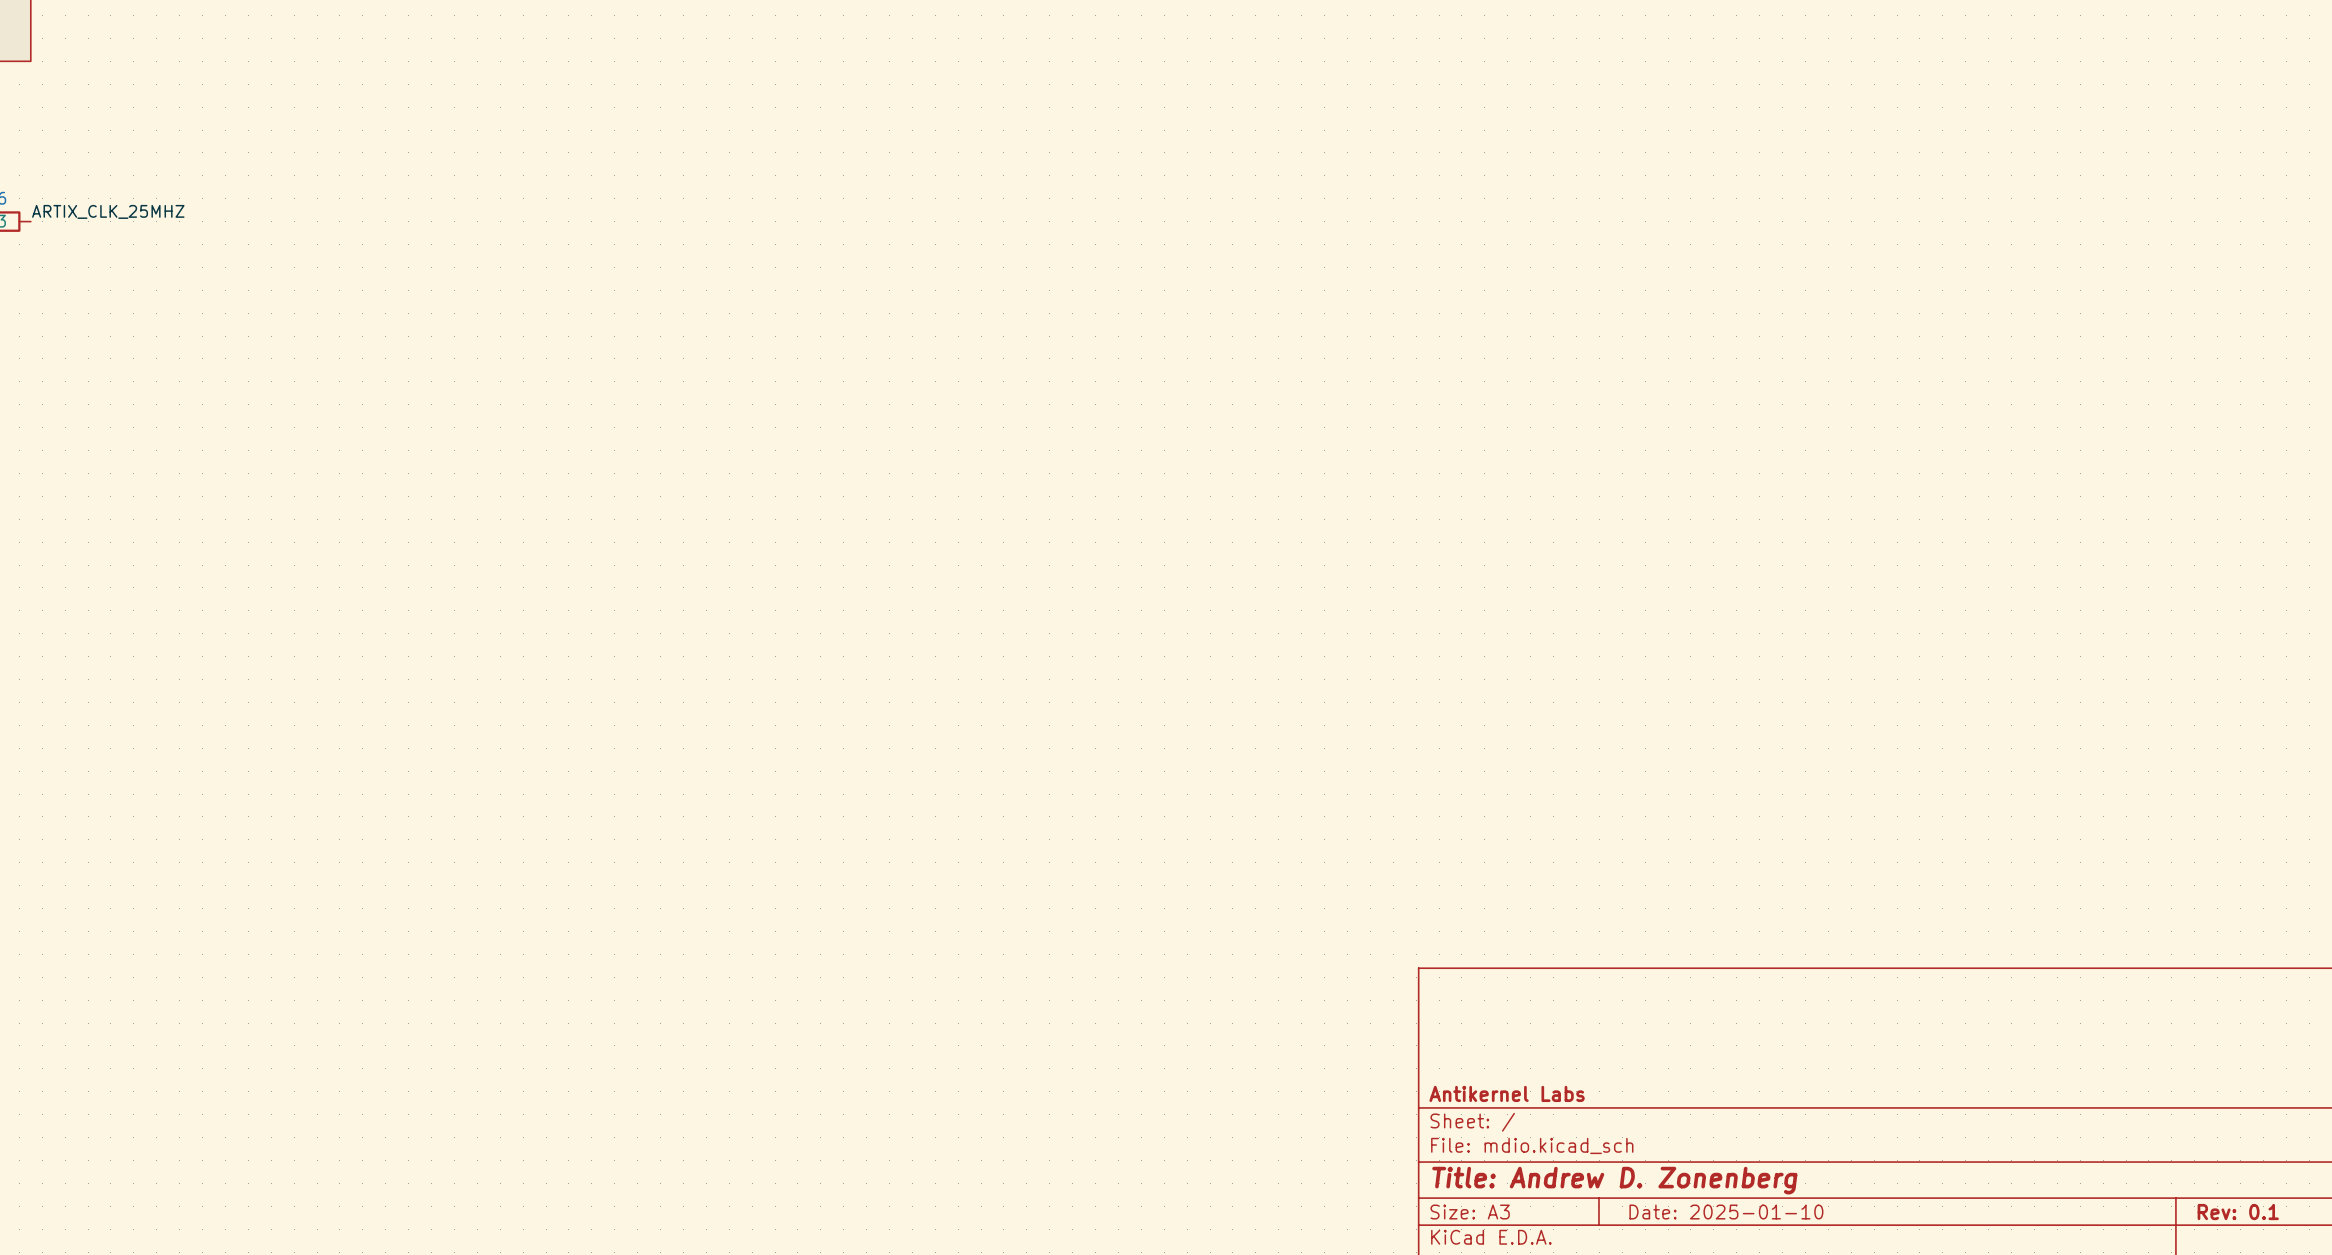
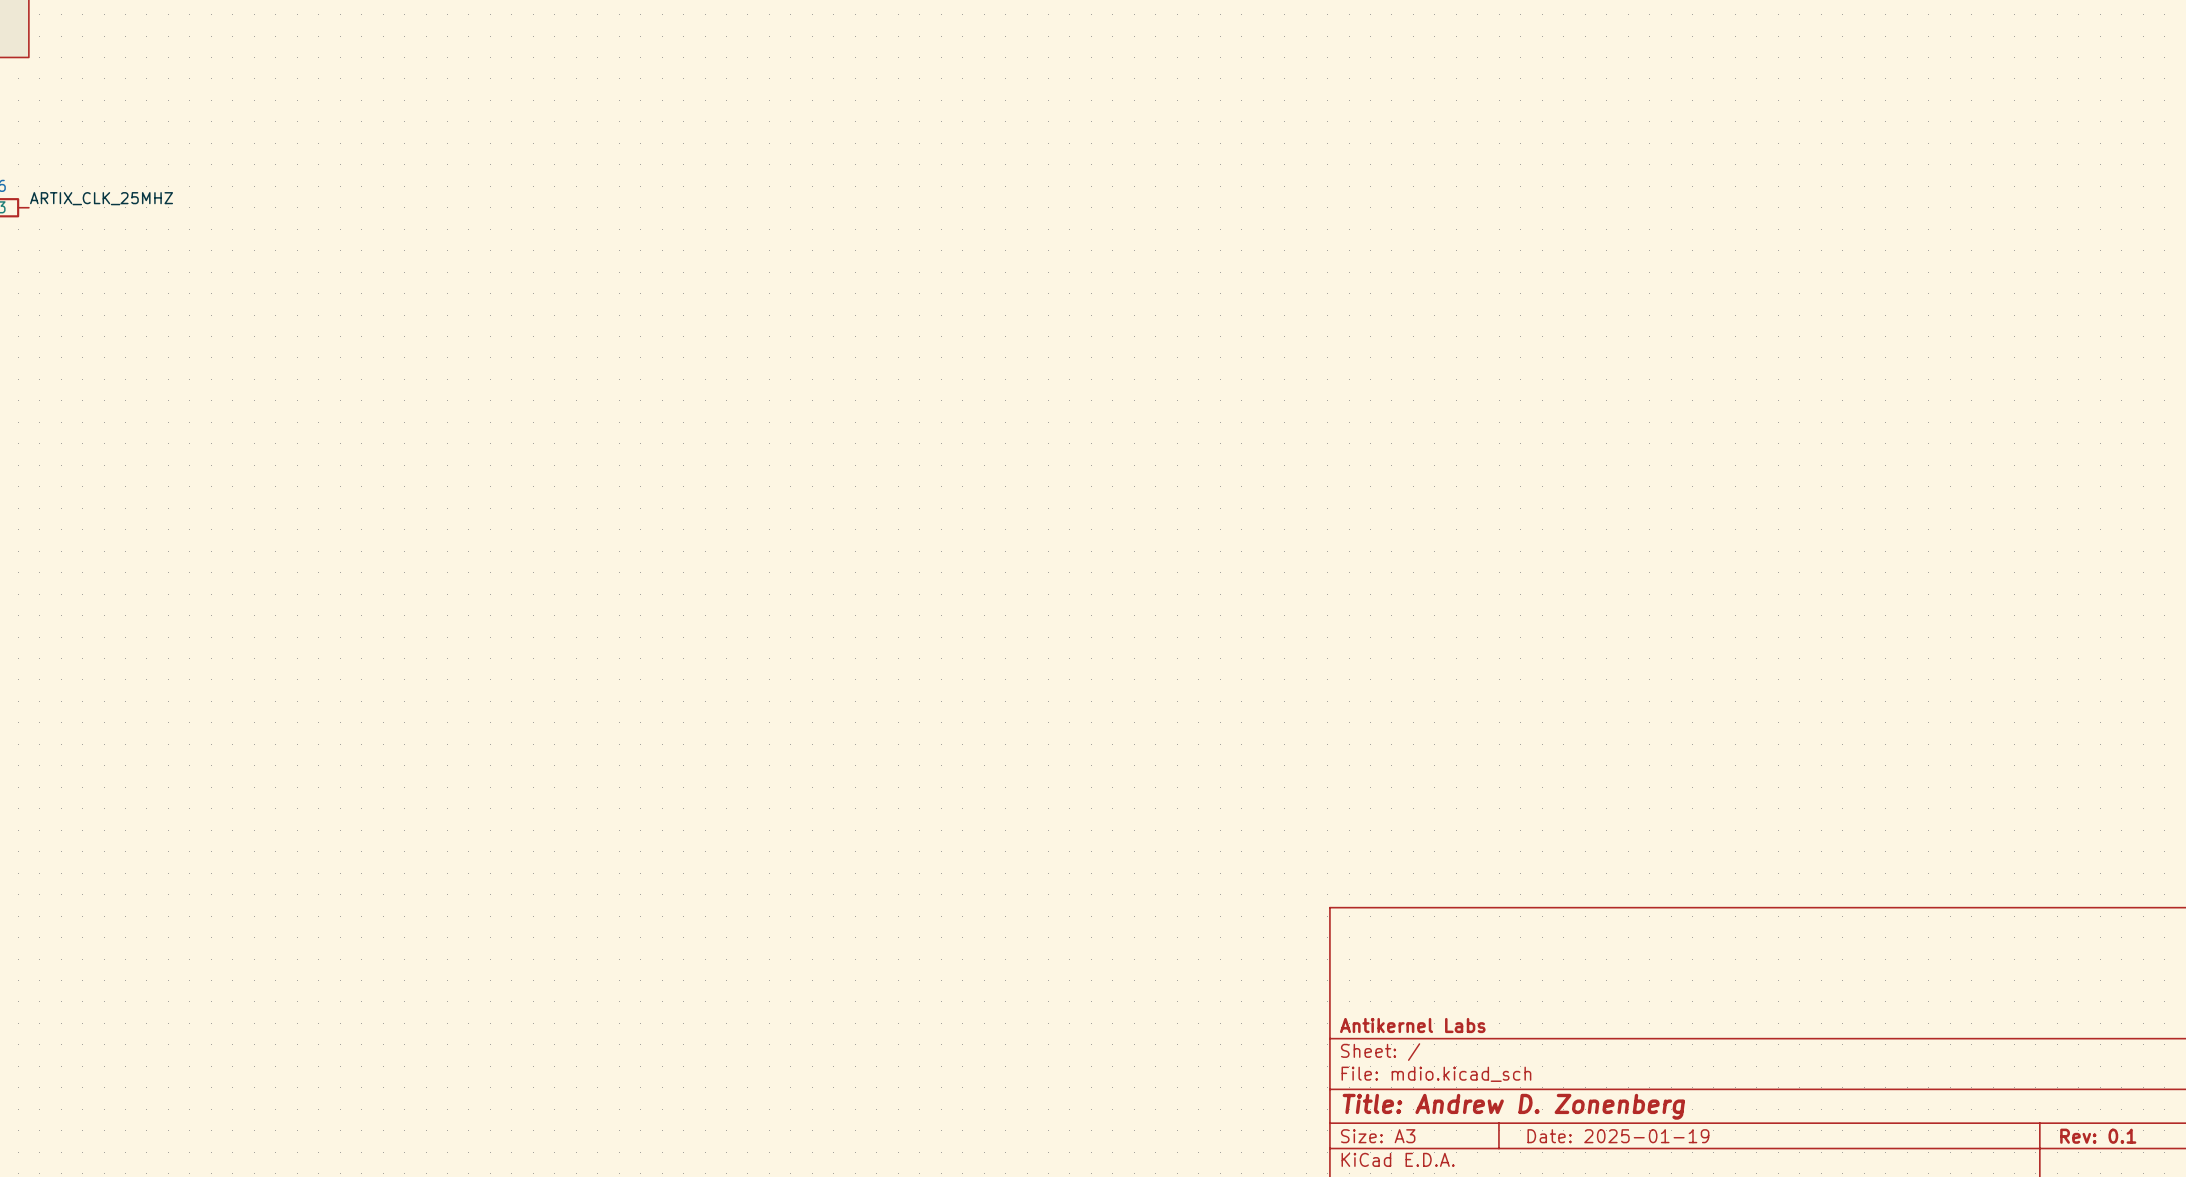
title block: Date: 2025-01-10 (1726, 1212) -> Date: 2025-01-19 (1618, 1136)

